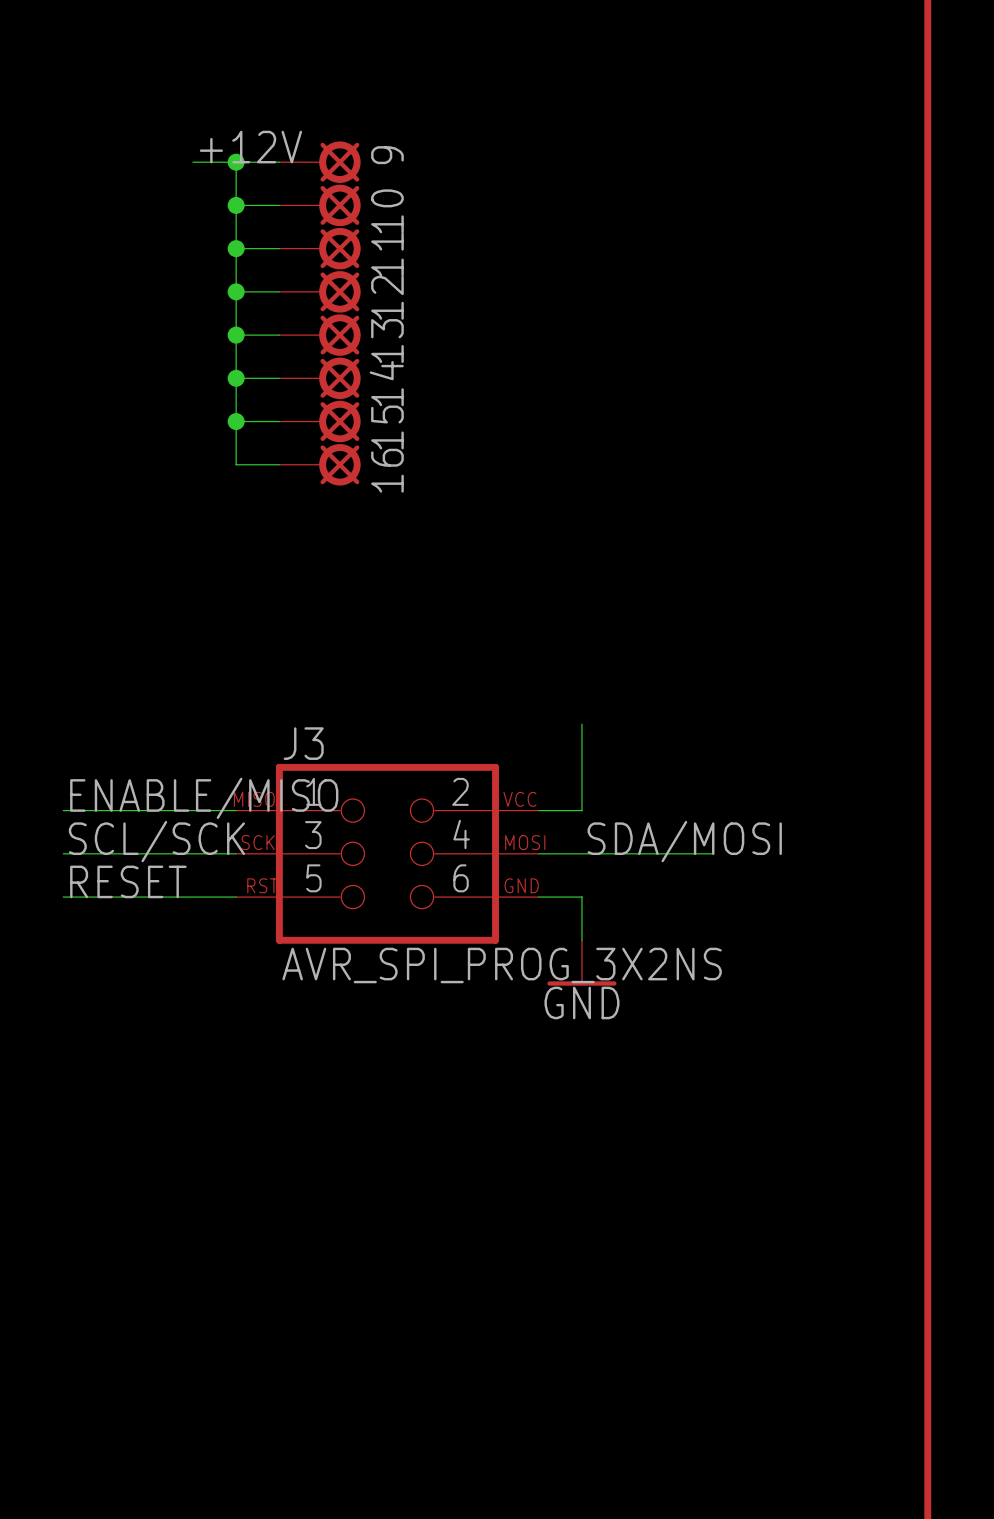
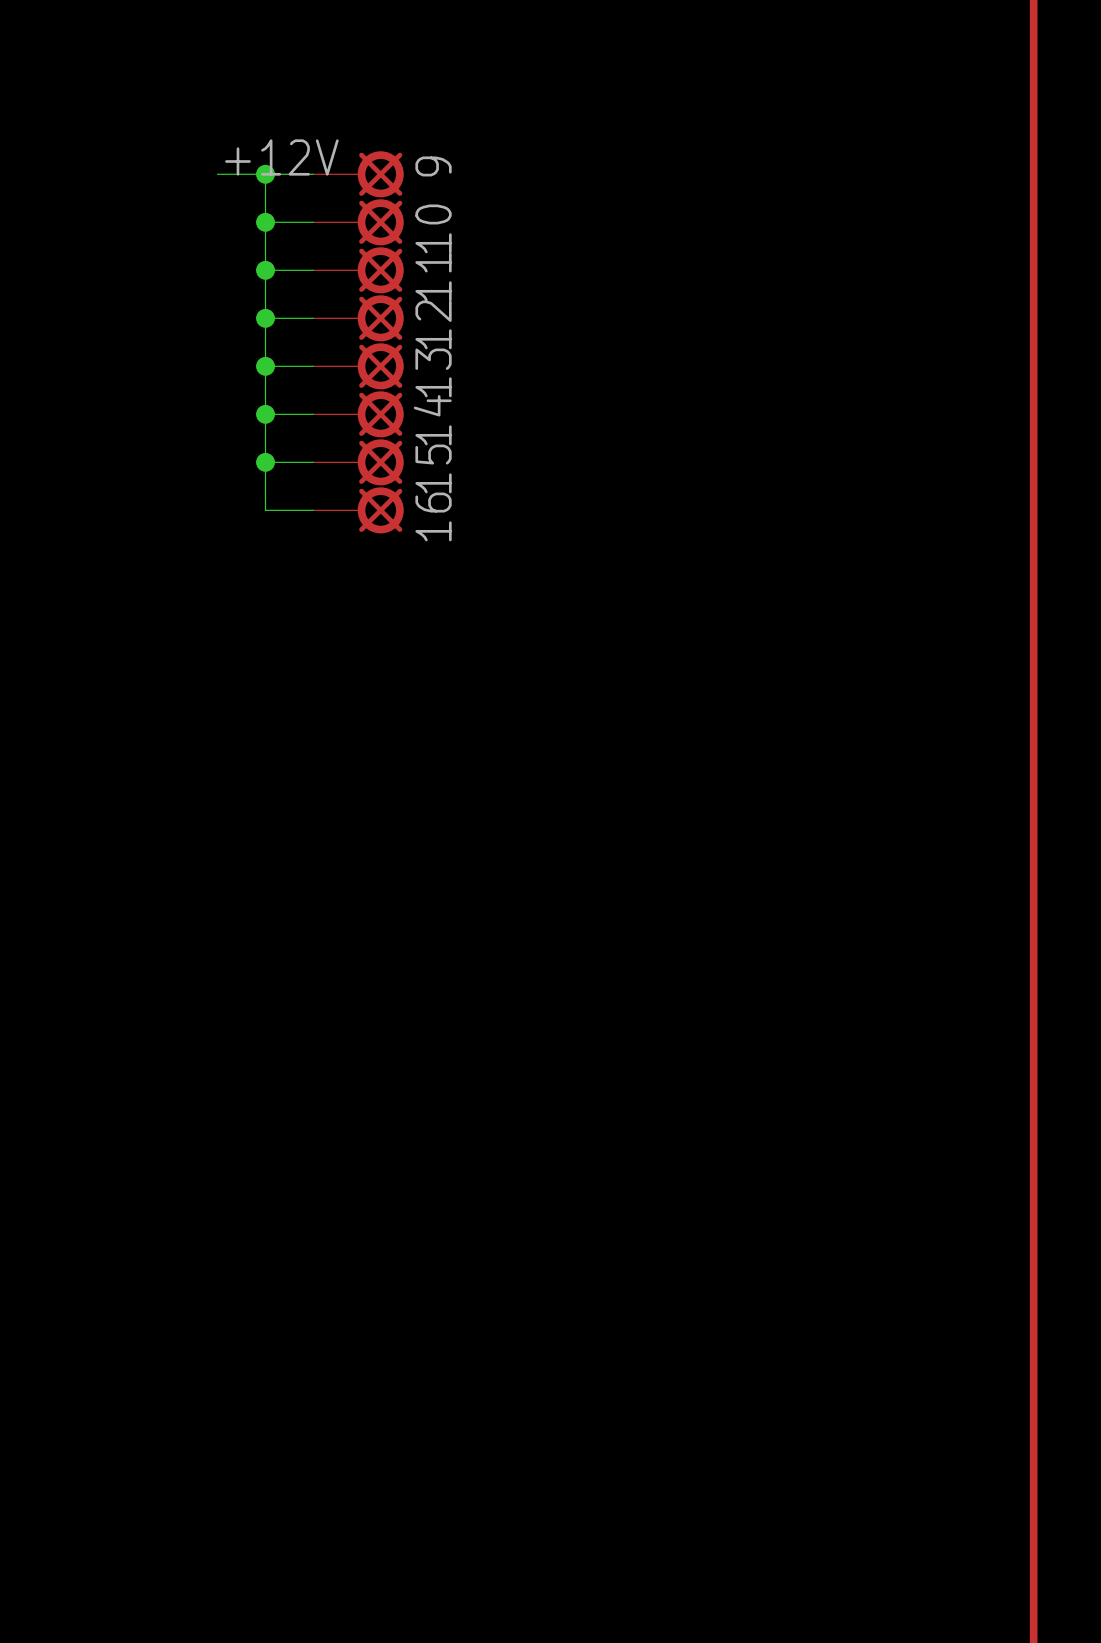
wire: (581, 724) (581, 810) (538, 810) -> none
label: ENABLE/MISO (204, 798) -> none
wire: (63, 810) (236, 810) -> none
label: SCL/SCK (156, 841) -> none
label: SDA/MOSI (684, 841) -> none
wire: (63, 853) (236, 853) -> none
J3: AVR_SPI_PROG_3X2NS (387, 853) -> none
wire: (538, 853) (711, 853) -> none
label: RESET (128, 881) -> none
wire: (63, 897) (236, 897) -> none
wire: (538, 897) (581, 897) (581, 940) -> none
power symbol: GND (581, 962) -> none

